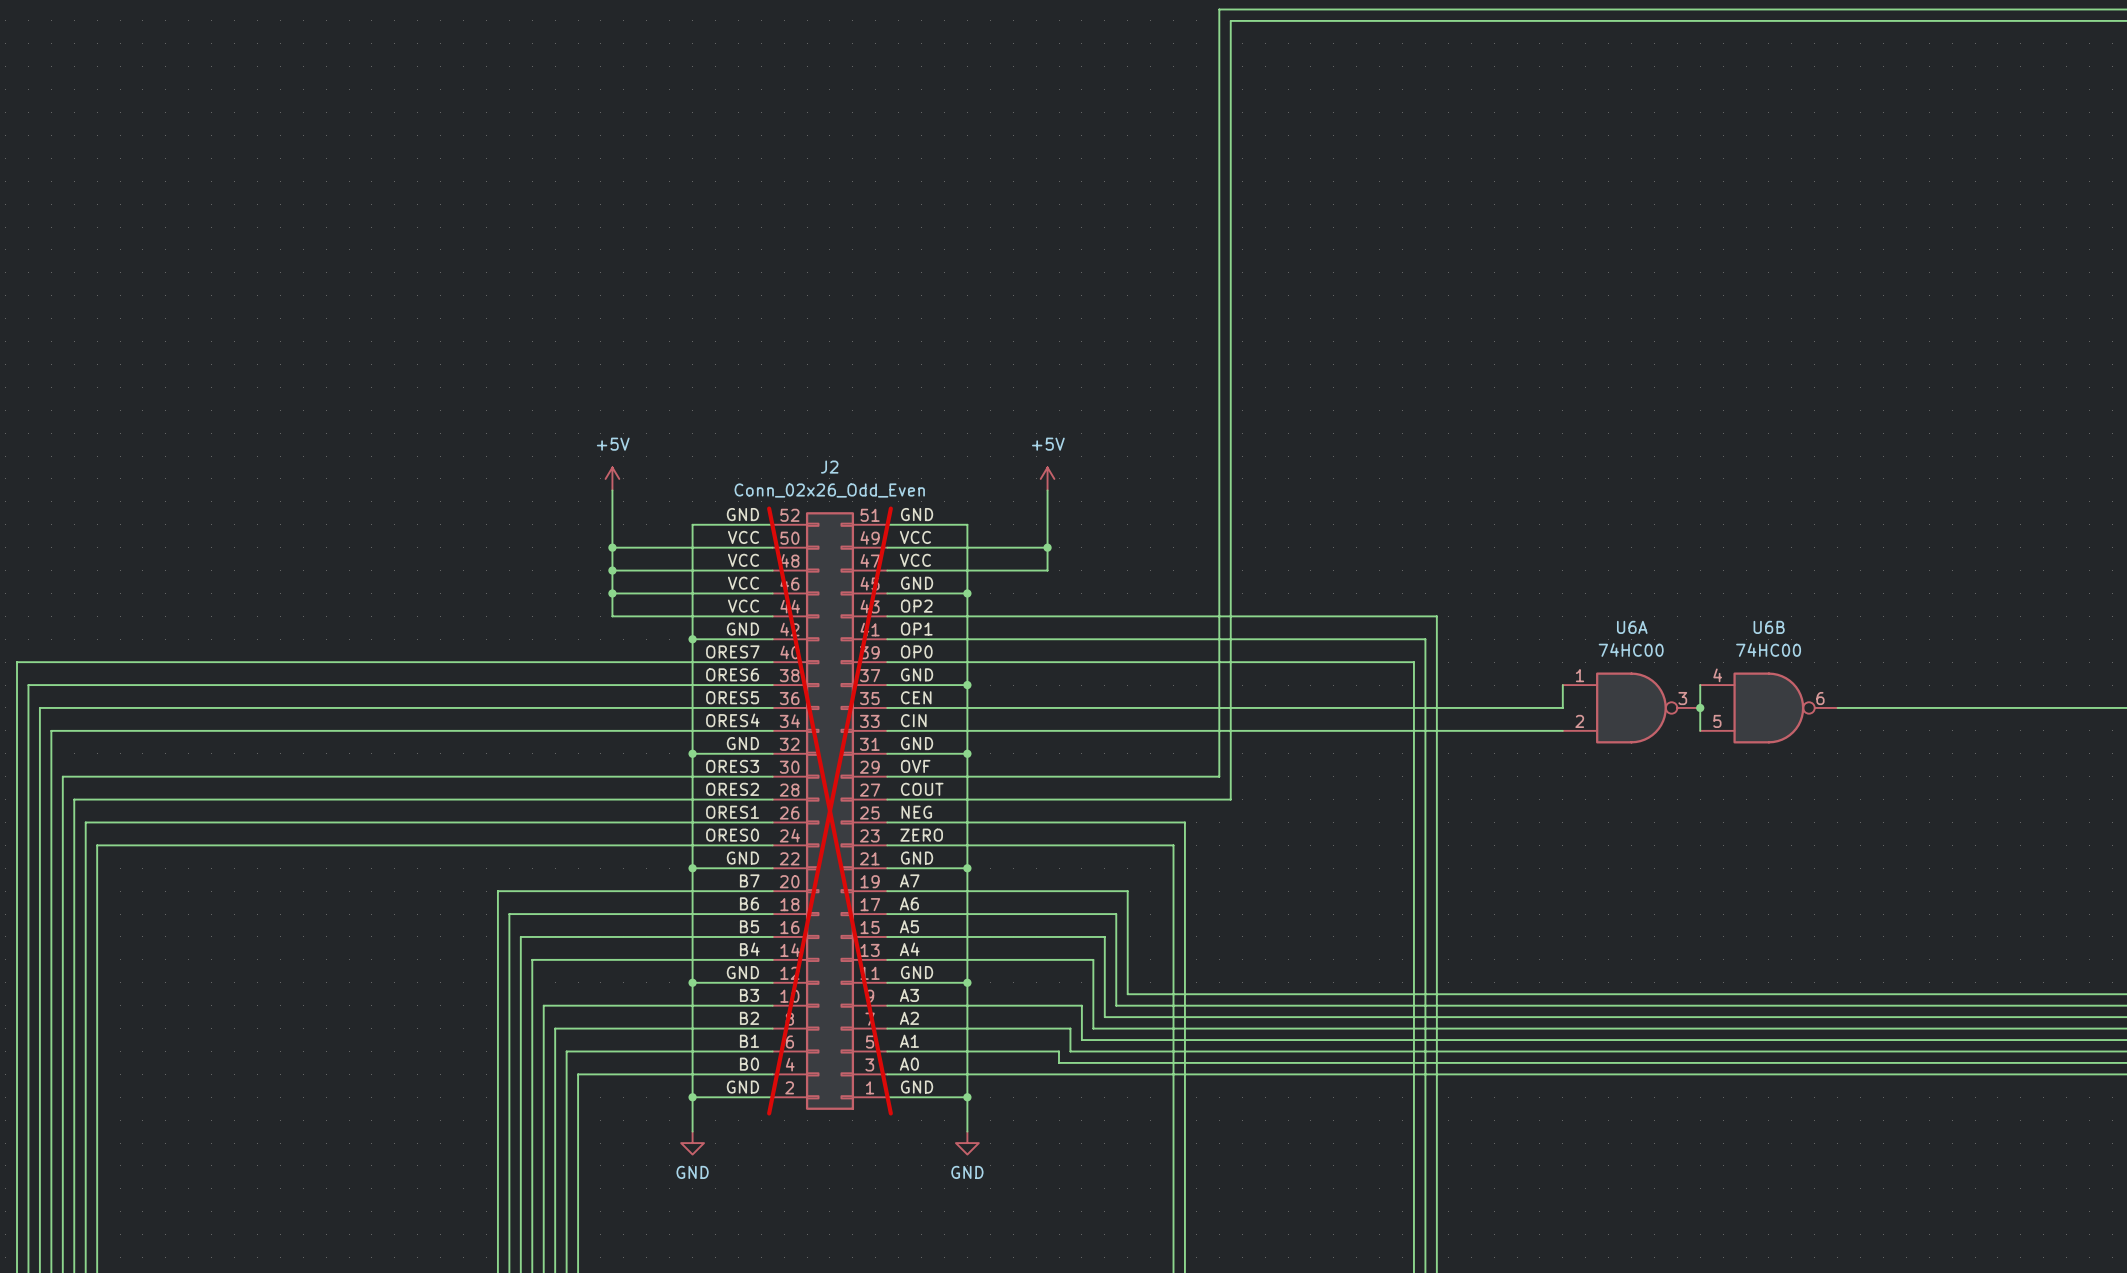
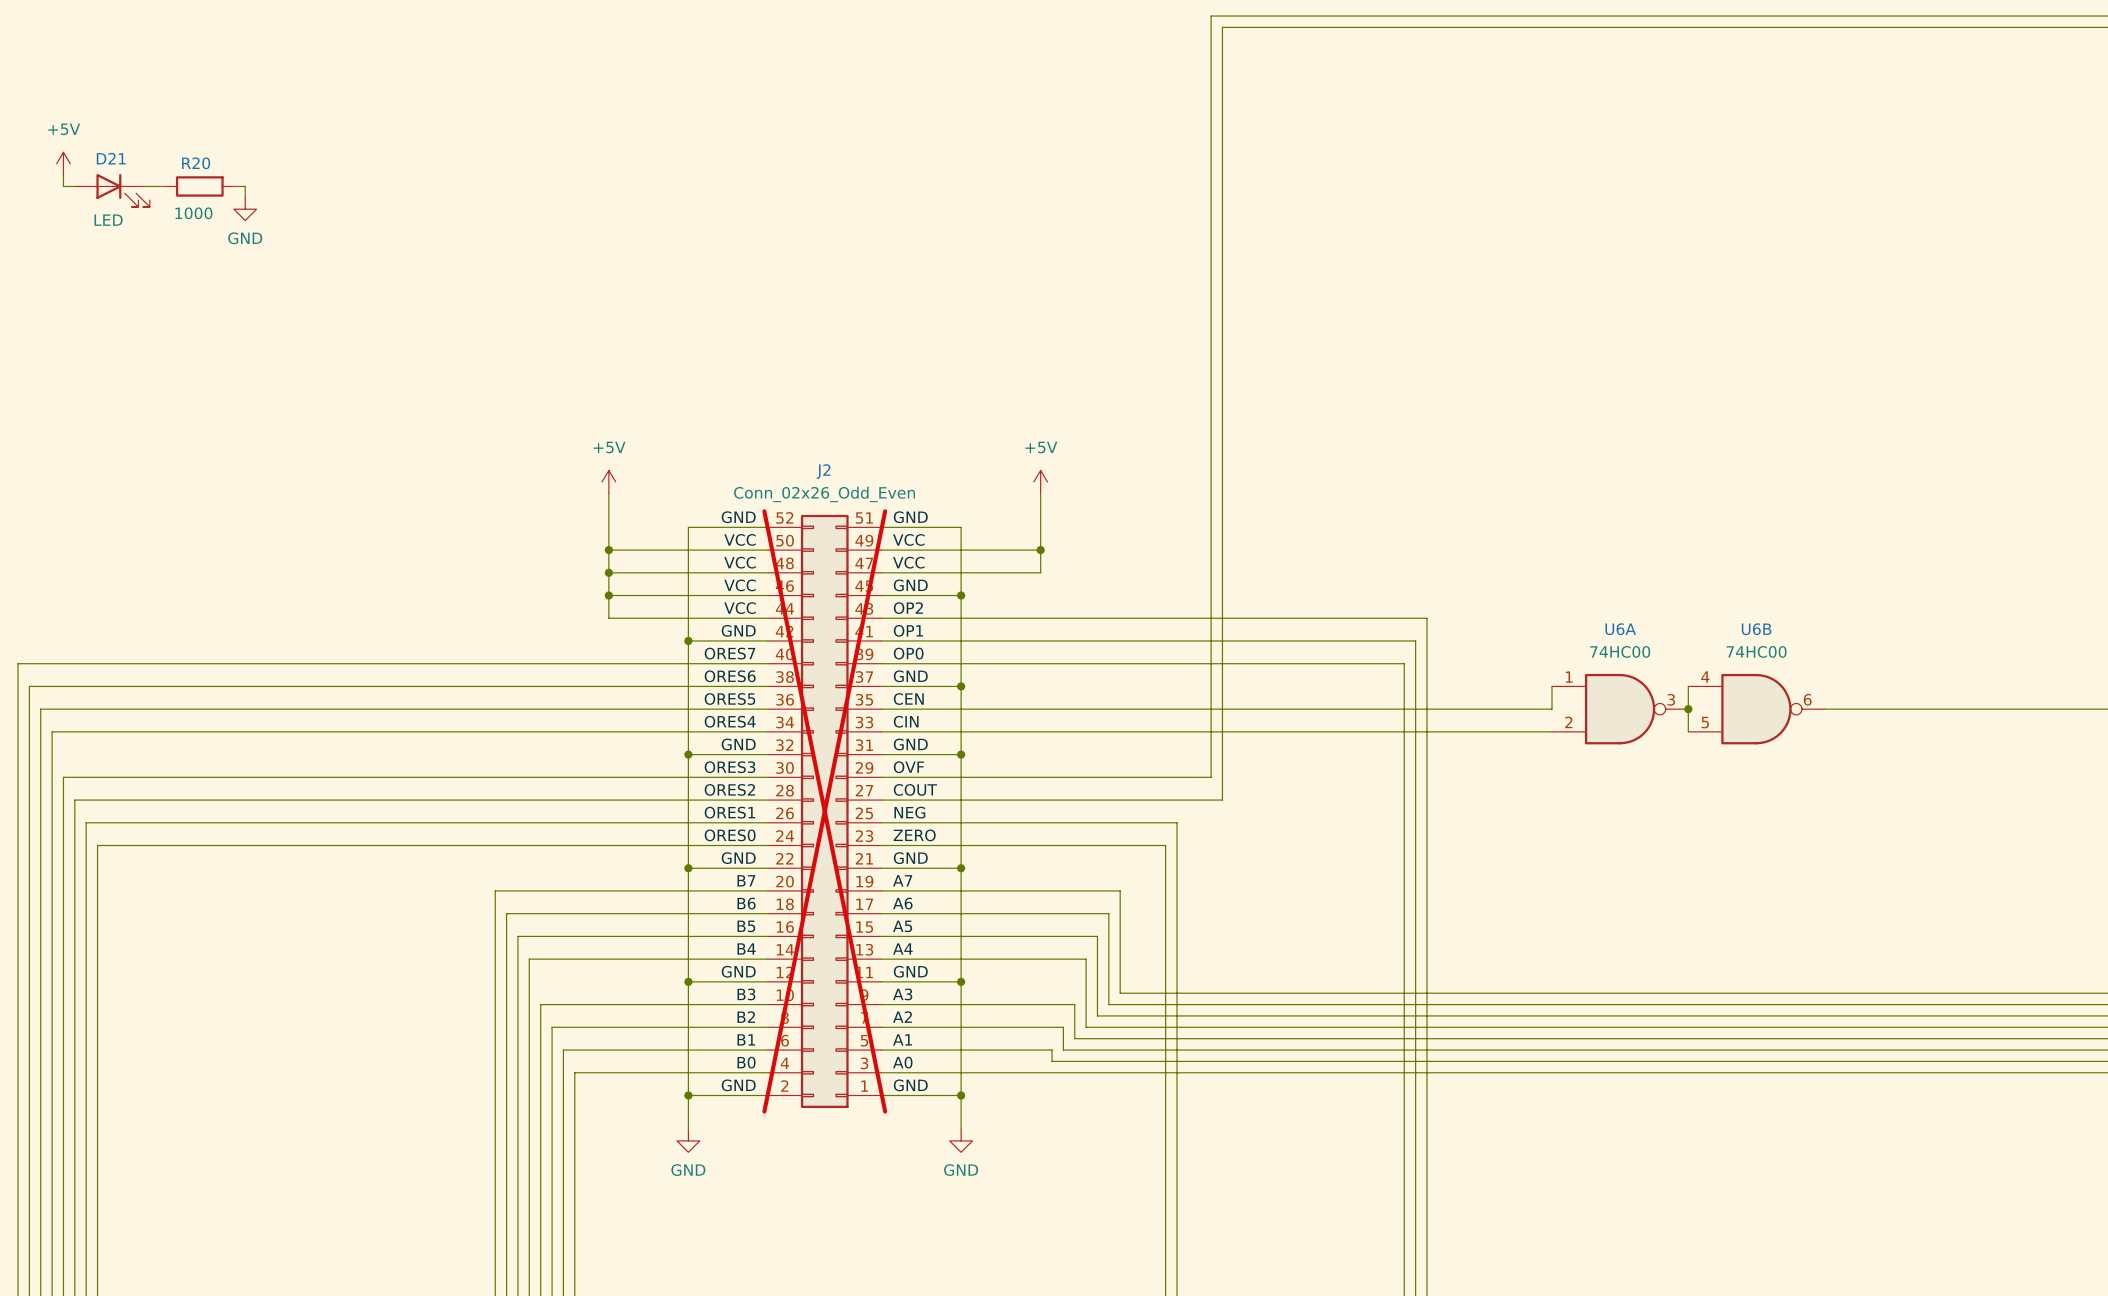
power symbol: none -> +5V (63, 163)
wire: none -> (63, 175) (63, 186) (74, 186)
wire: none -> (142, 186) (165, 186)
R20: none -> 1000 (199, 186)
wire: none -> (233, 186) (245, 186) (245, 197)
D21: none -> LED (112, 190)
power symbol: none -> GND (245, 209)

